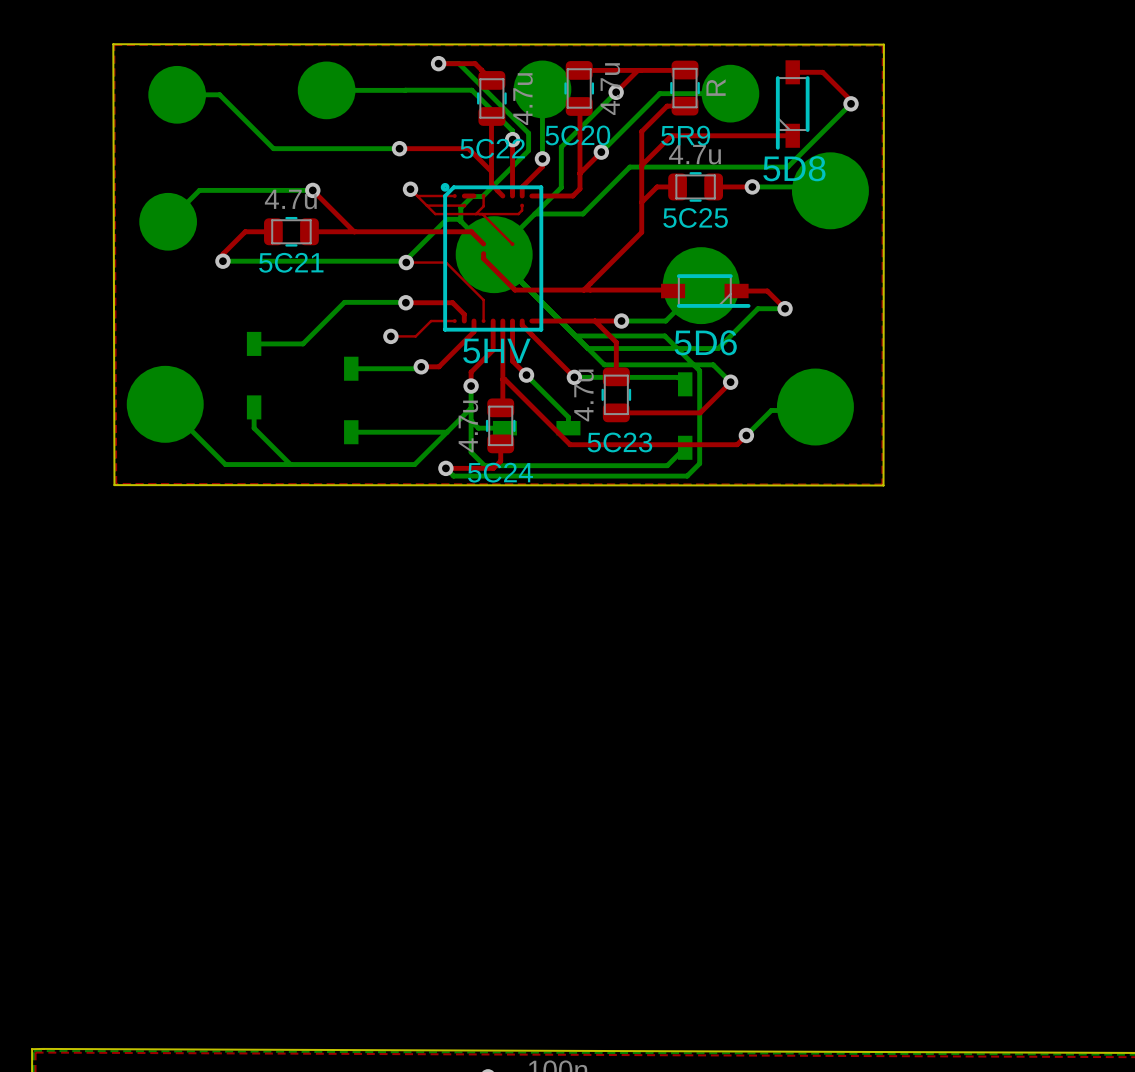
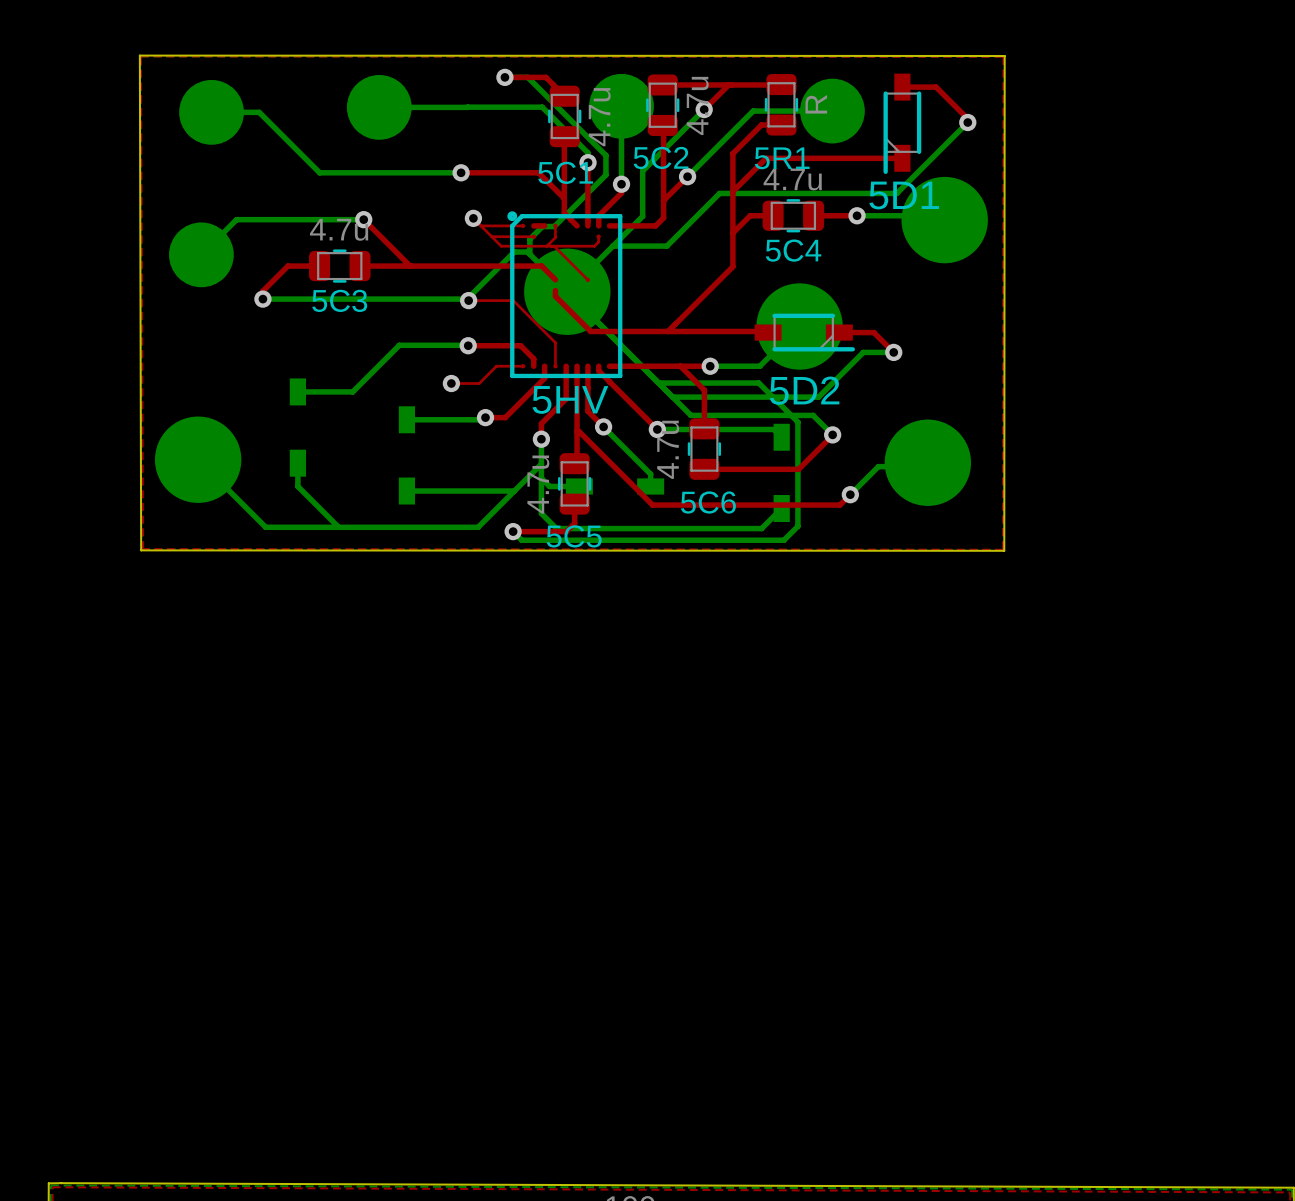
5C20 name: 5C20 (577, 135) -> 5C2 (661, 157)
5R9 name: 5R9 (685, 135) -> 5R1 (782, 158)
5C22 name: 5C22 (492, 148) -> 5C1 (565, 172)
5D8 name: 5D8 (794, 168) -> 5D1 (904, 195)
5C25 name: 5C25 (695, 217) -> 5C4 (793, 250)
5C21 name: 5C21 (291, 262) -> 5C3 (339, 300)
5D6 name: 5D6 (705, 342) -> 5D2 (804, 390)
5C23 name: 5C23 (619, 442) -> 5C6 (708, 502)
5C24 name: 5C24 (500, 472) -> 5C5 (574, 536)

